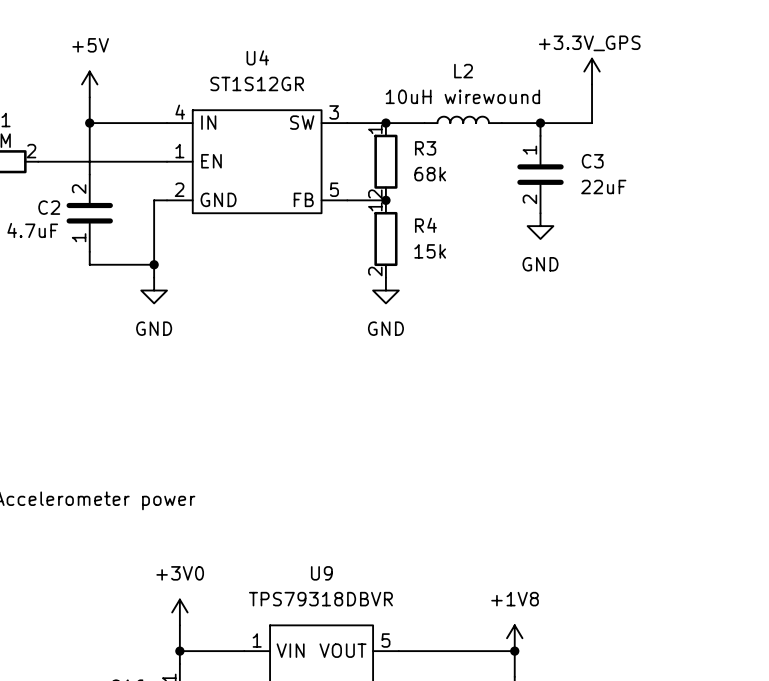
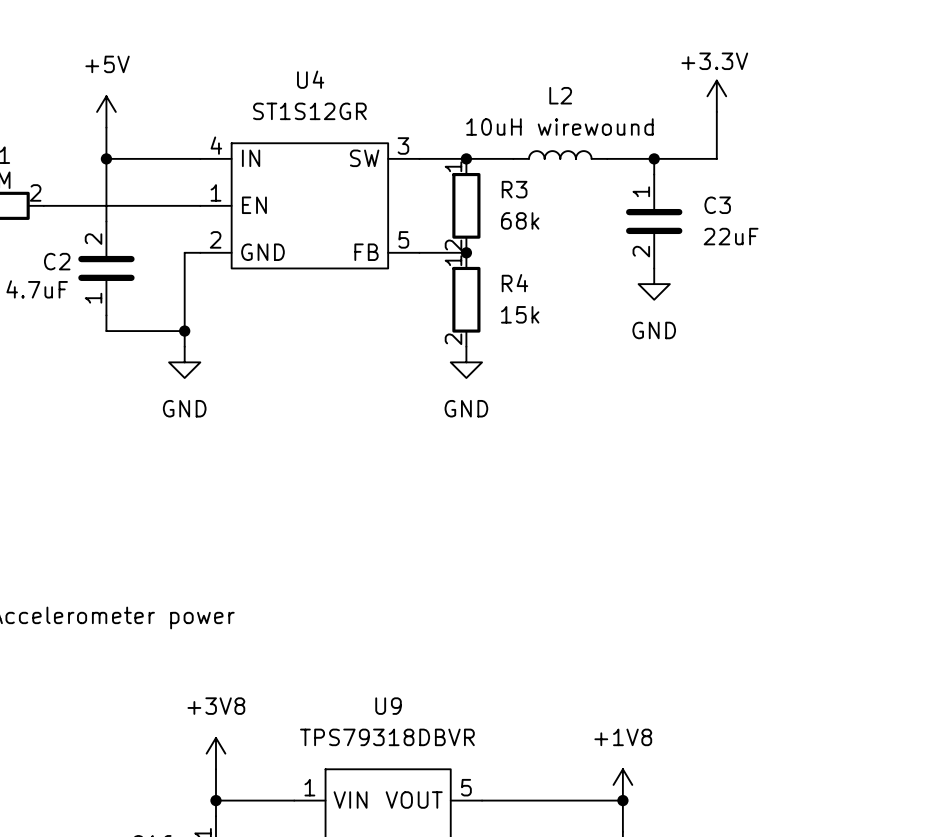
power symbol: +3.3V_GPS (592, 71) -> +3.3V (716, 96)
power symbol: +3V0 (179, 612) -> +3V8 (215, 753)

